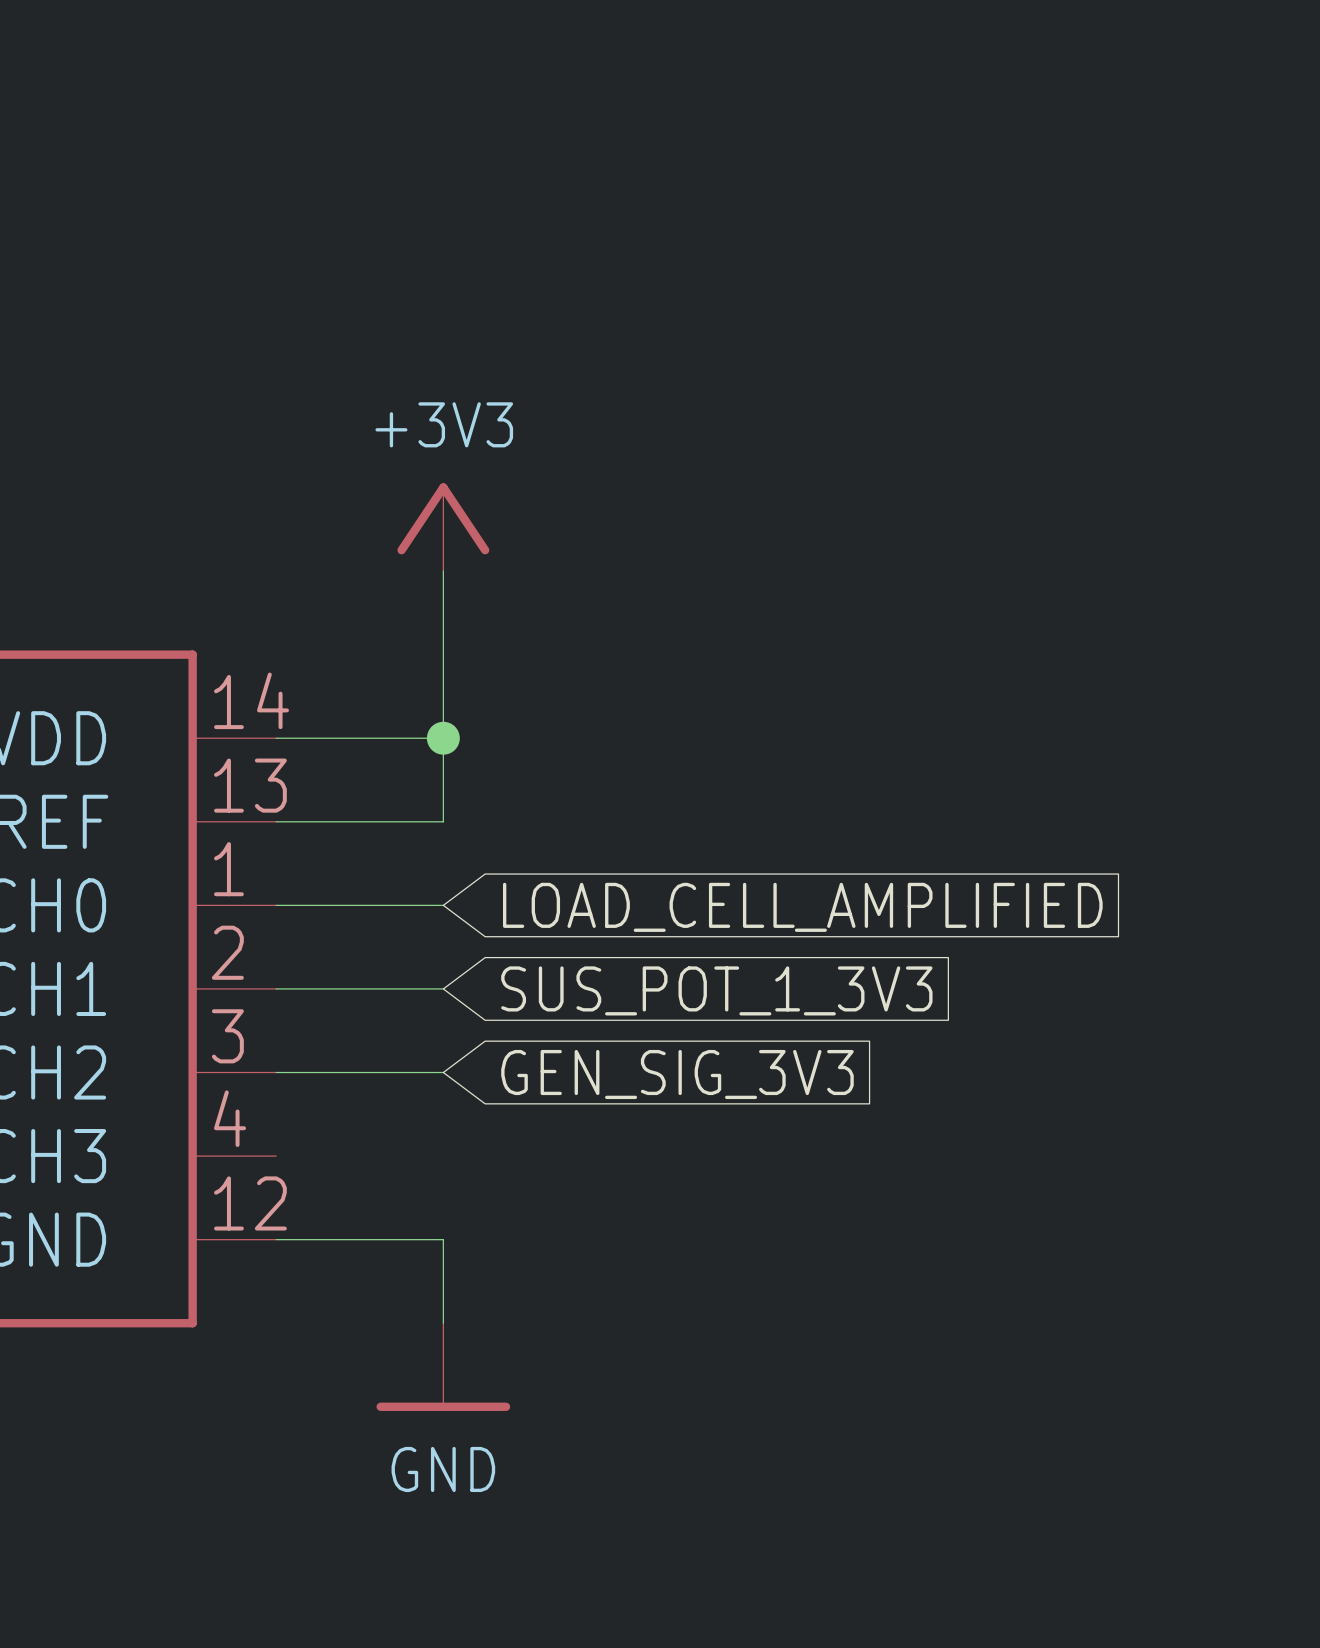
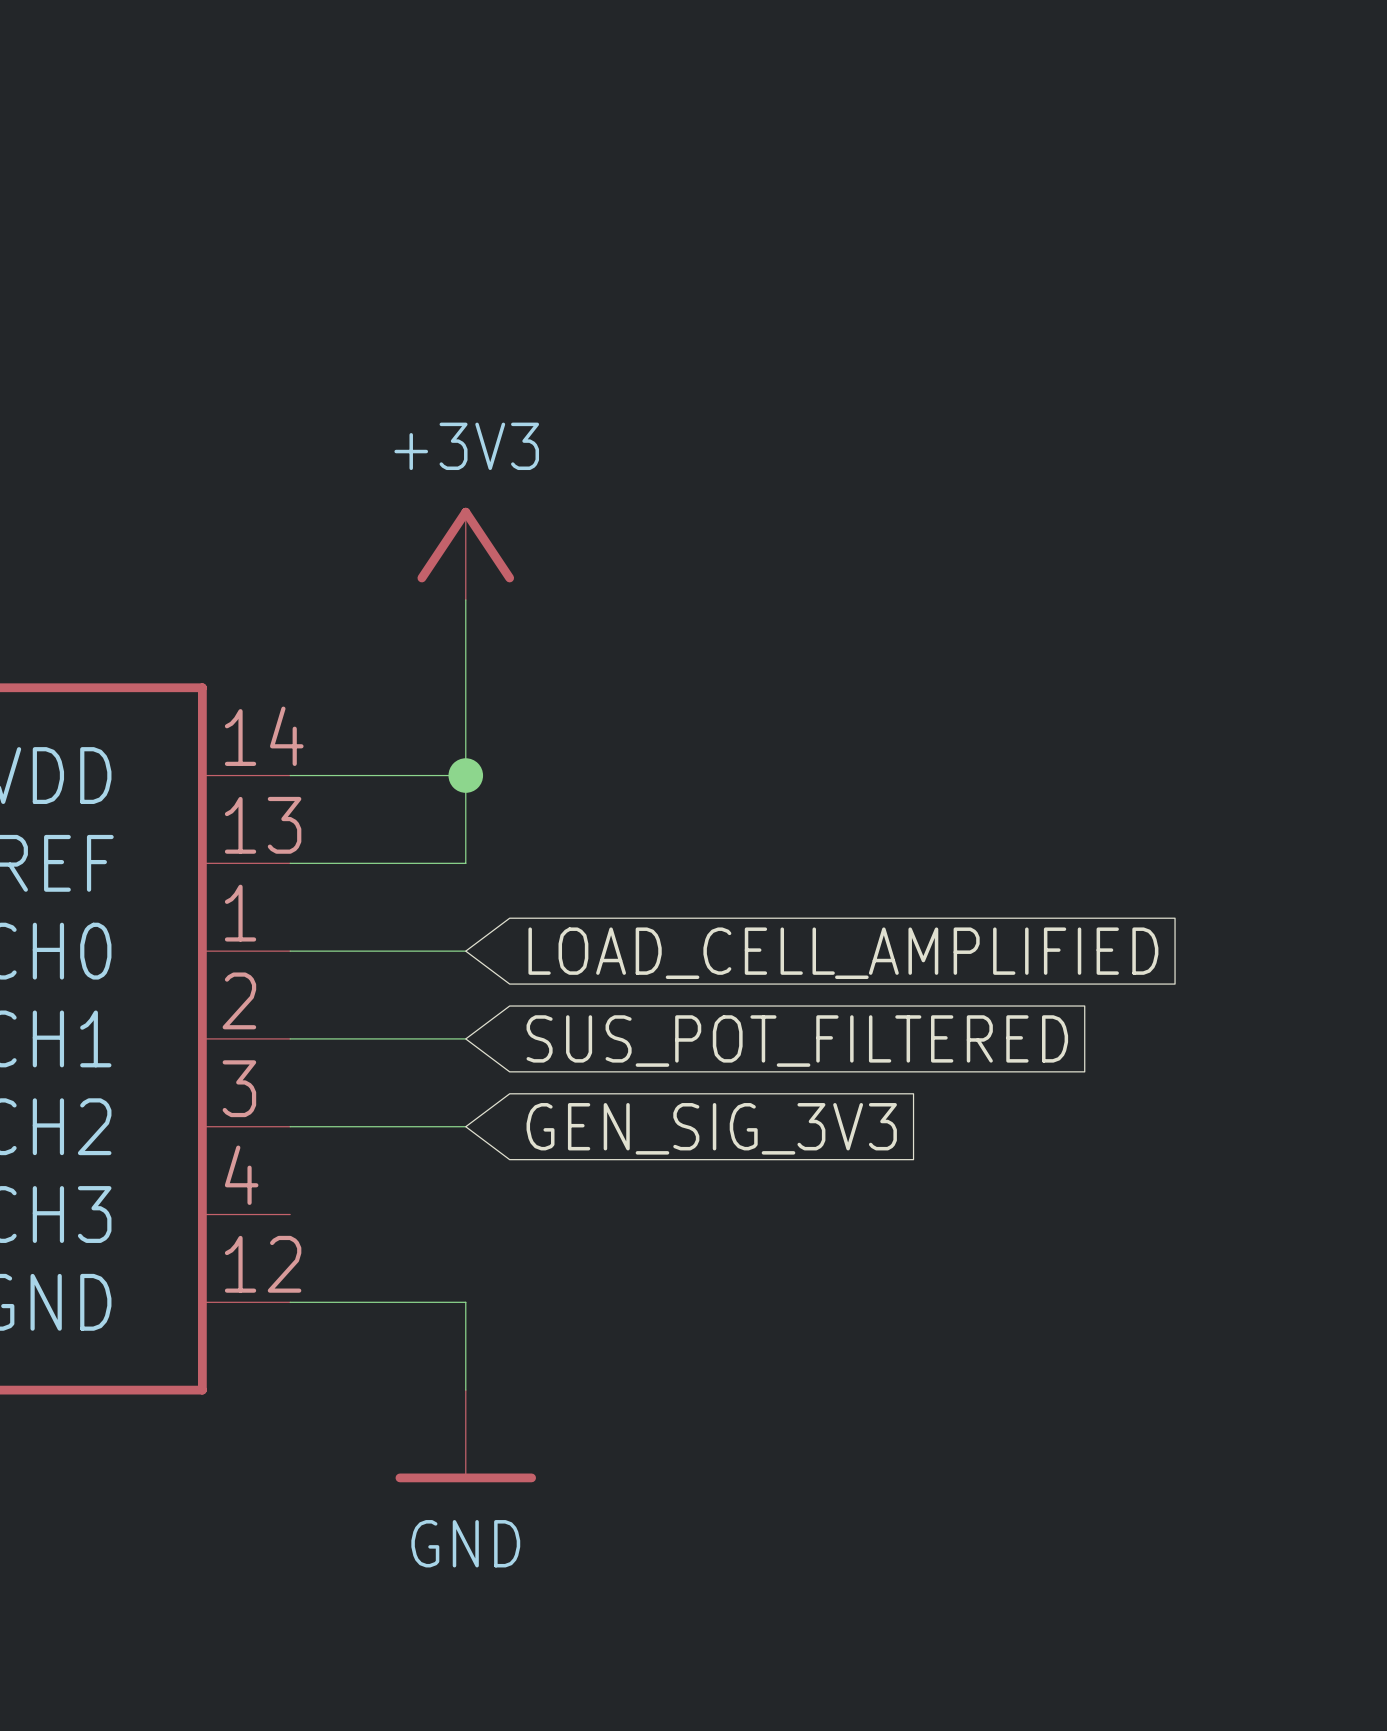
global label: SUS_POT_1_3V3 (716, 990) -> SUS_POT_FILTERED (797, 1041)

